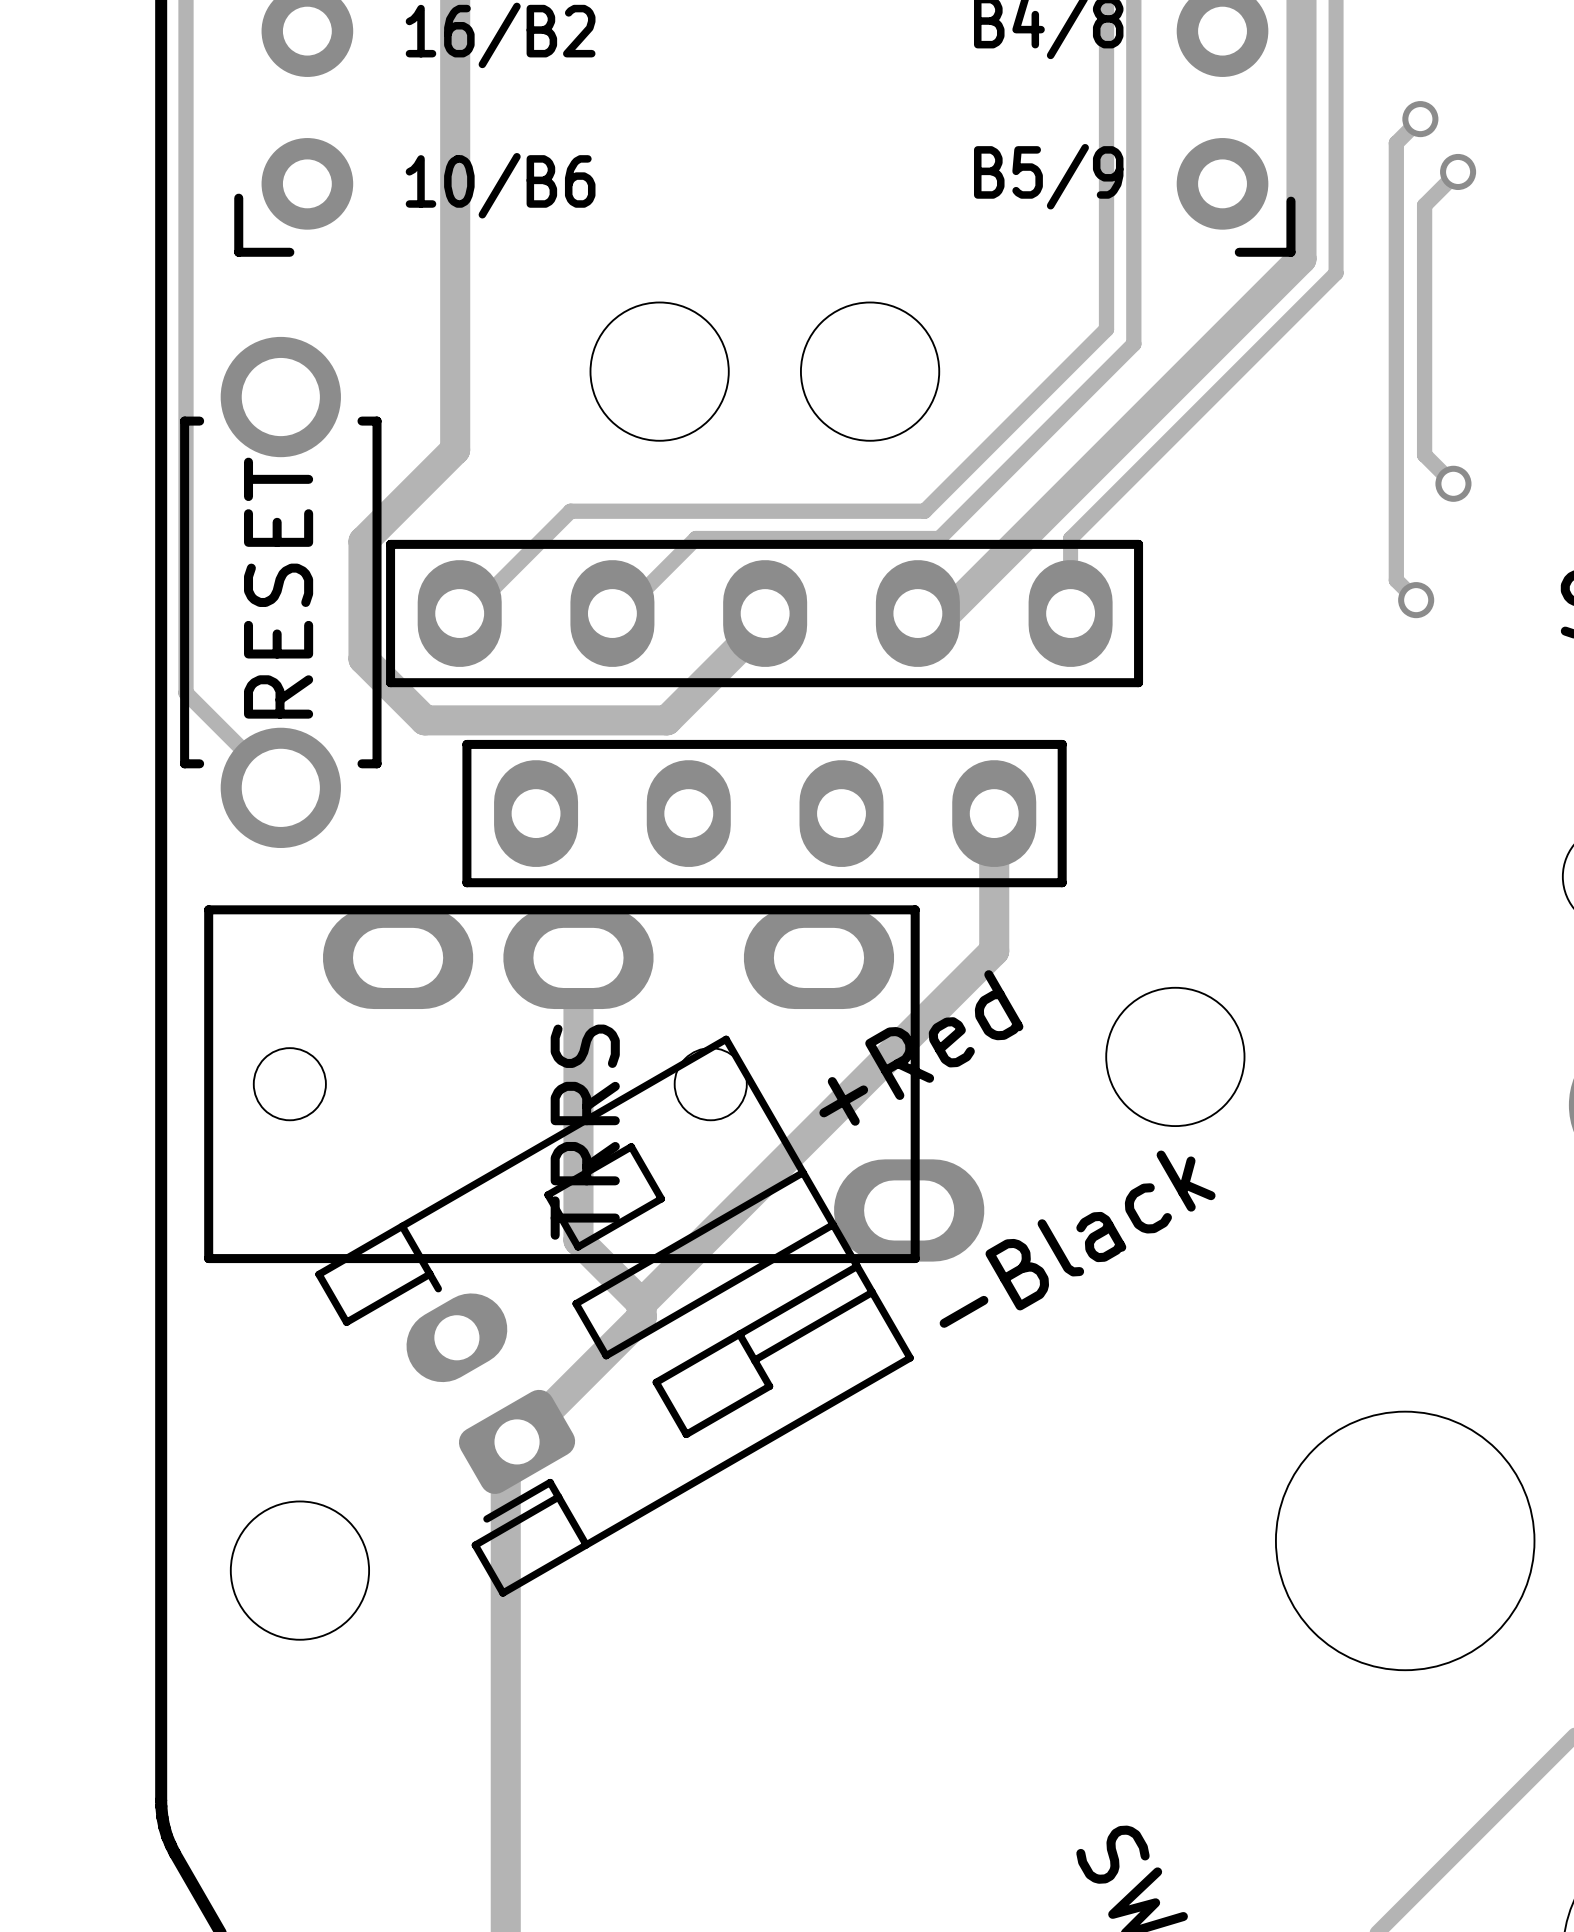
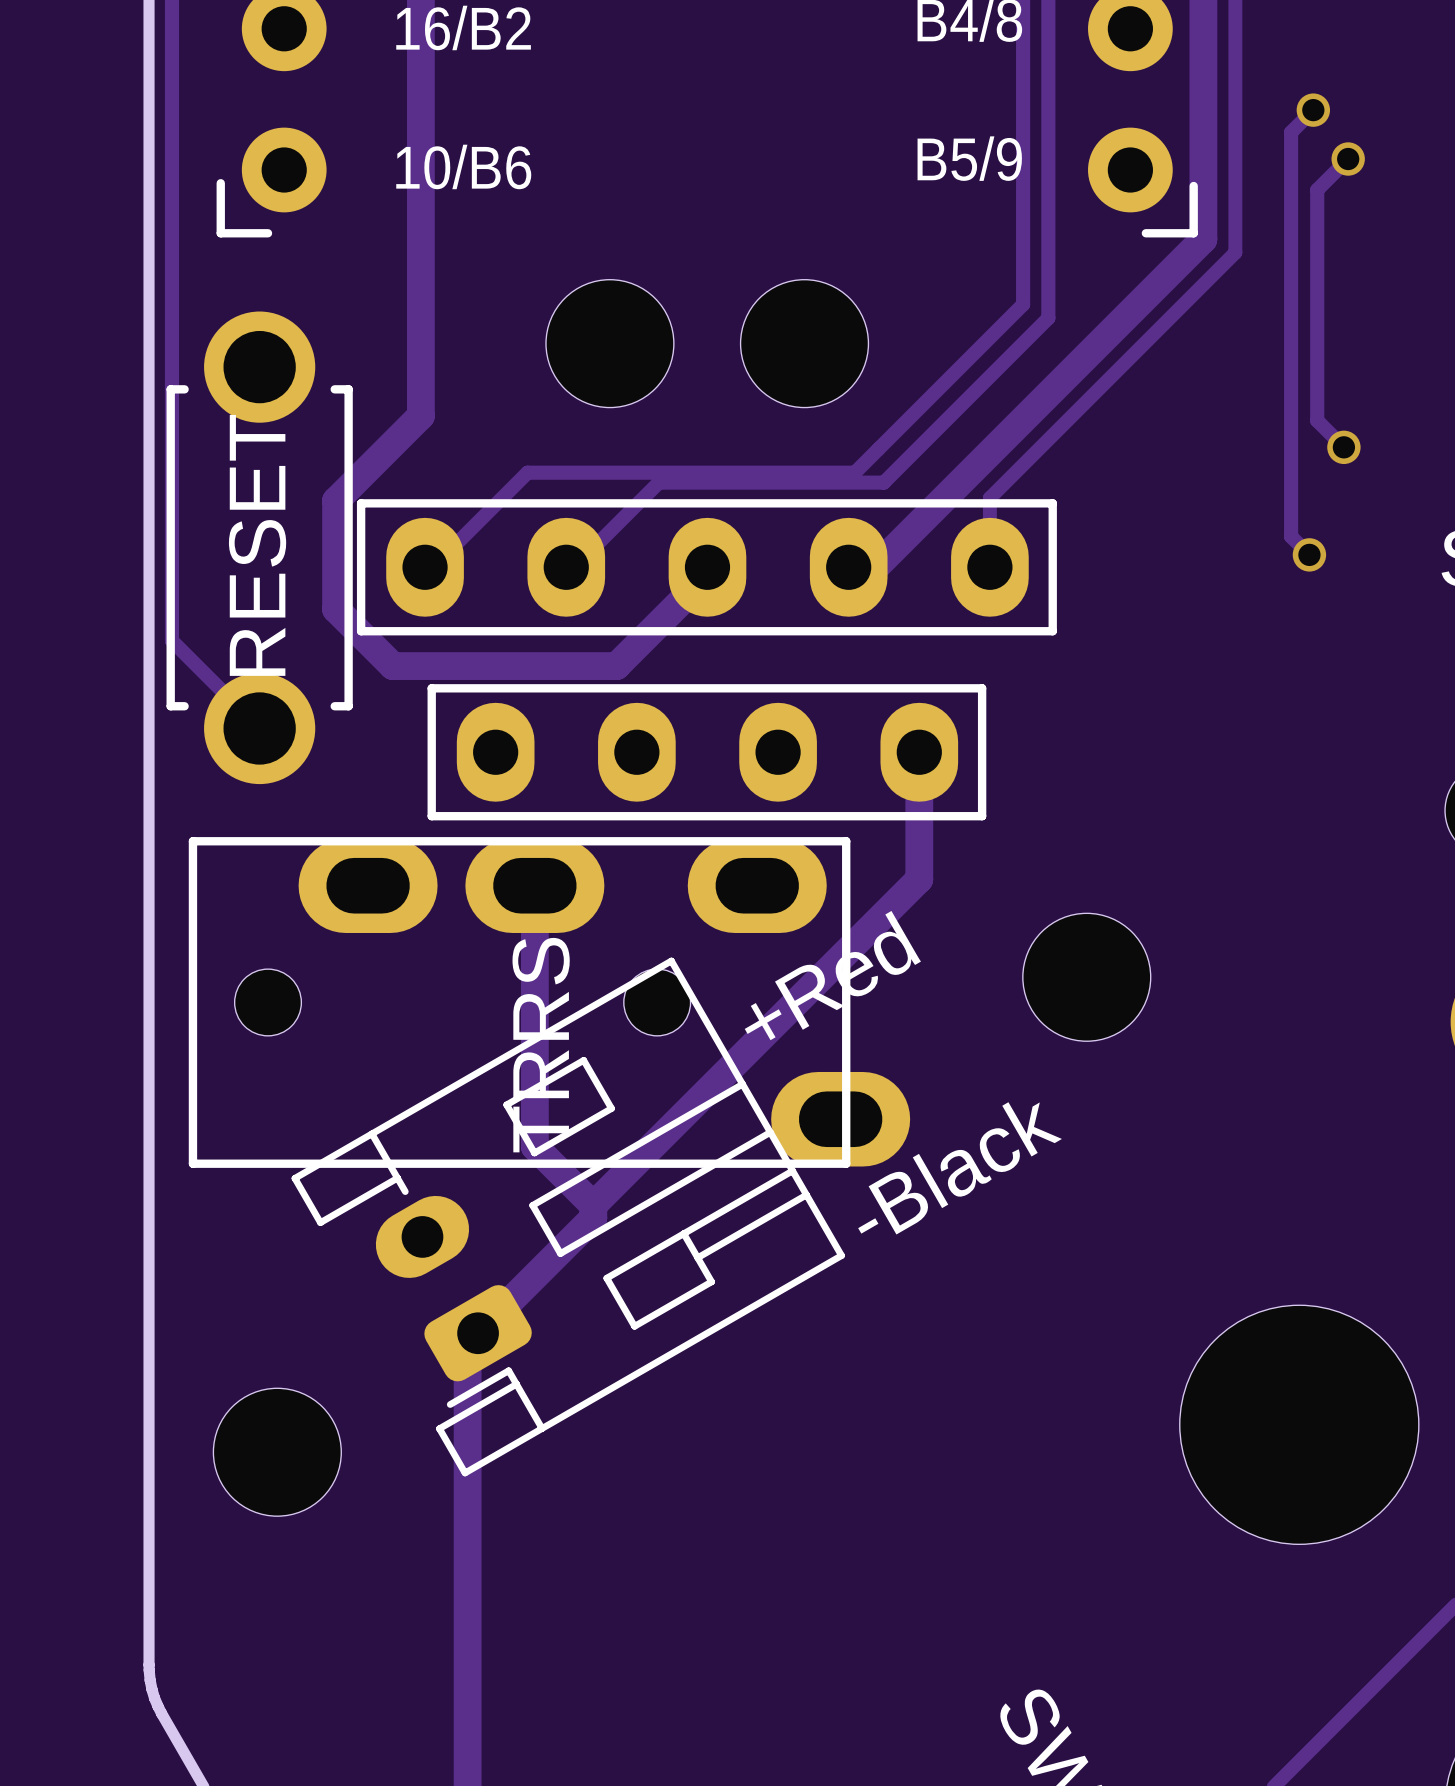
track: (955, 521) (939, 538) (695, 538) -> (883, 482) (658, 482) (643, 497)

